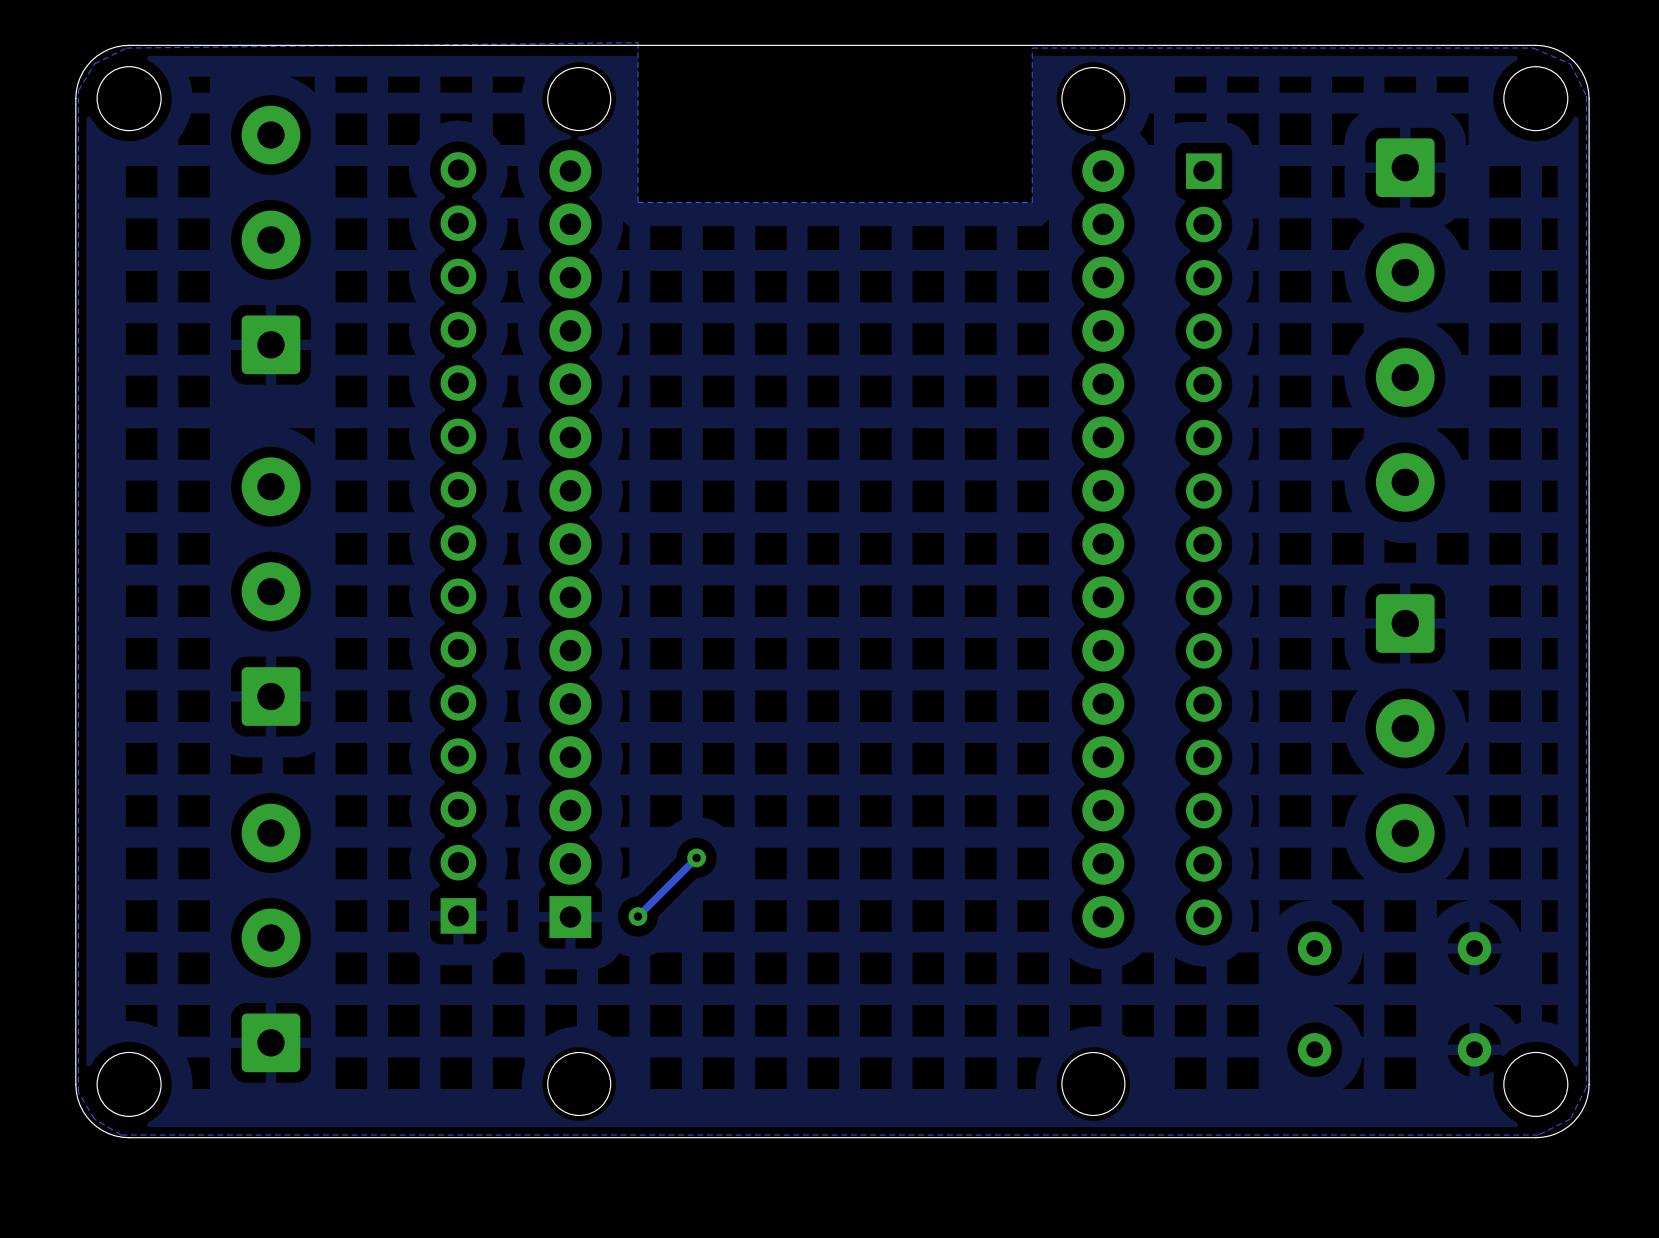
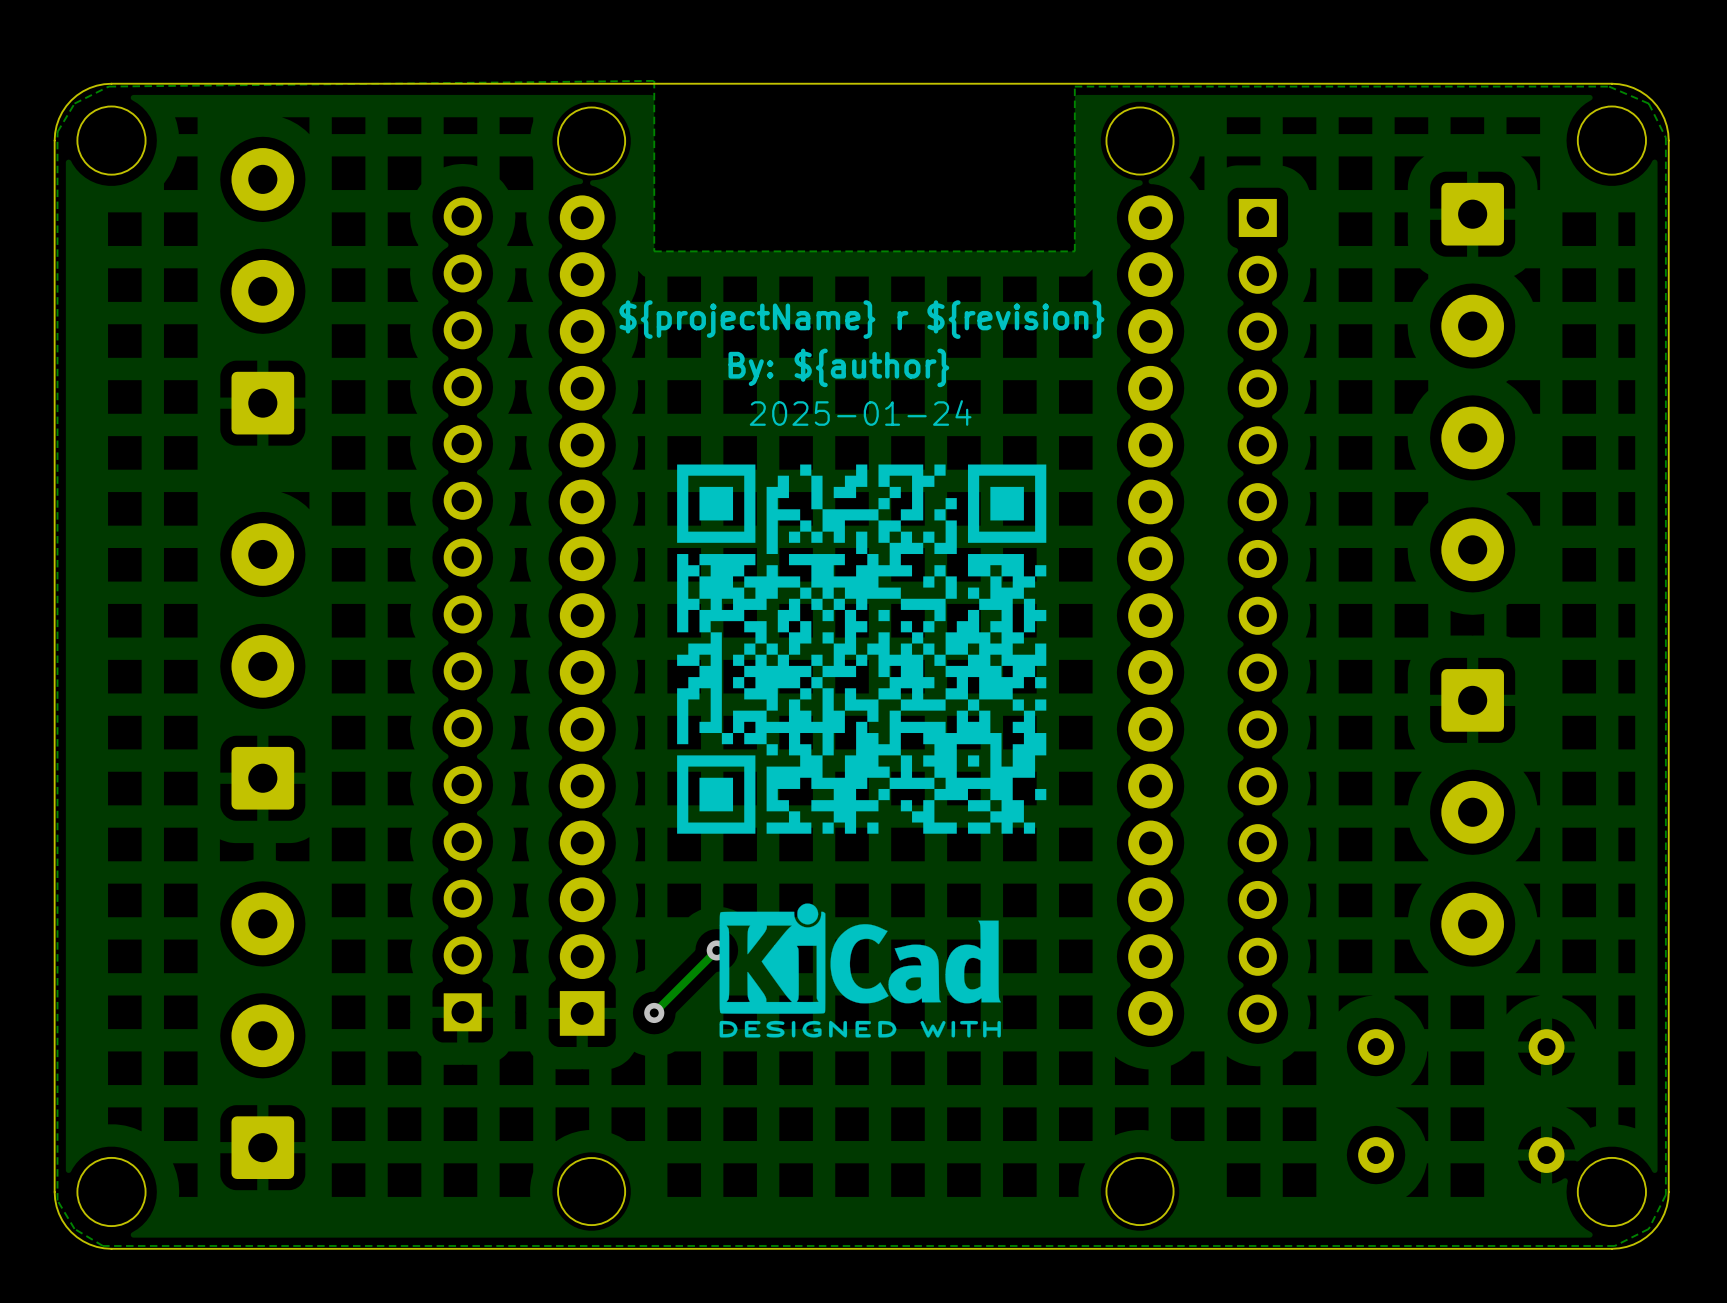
text: none -> ${projectName} r ${revision} (861, 319)
text: none -> By: ${author} (838, 367)
text: none -> 2025-01-24 (860, 413)
drawing: none -> [677, 464, 1047, 834]
drawing: none -> [719, 903, 1001, 1038]

